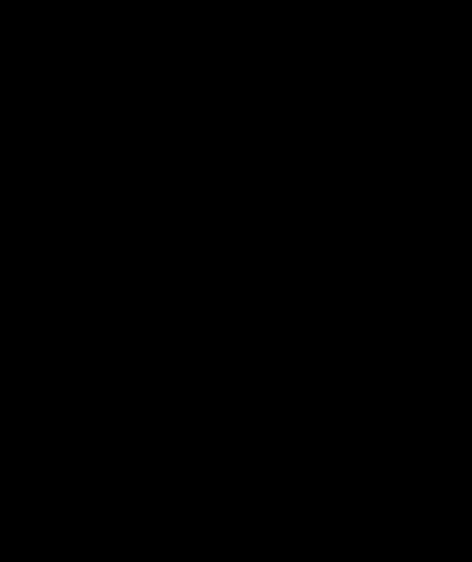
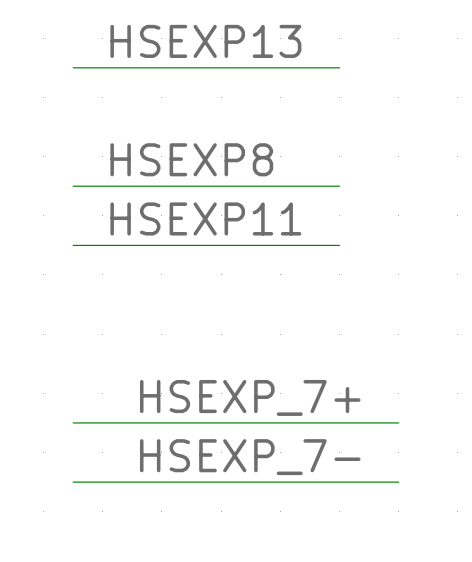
label: none -> HSEXP13 (205, 41)
wire: none -> (73, 67) (339, 67)
label: none -> HSEXP8 (191, 159)
wire: none -> (73, 186) (339, 186)
label: none -> HSEXP11 (205, 218)
wire: none -> (73, 245) (339, 245)
label: none -> HSEXP_7+ (250, 397)
wire: none -> (73, 422) (398, 422)
label: none -> HSEXP_7- (250, 457)
wire: none -> (73, 482) (398, 482)

